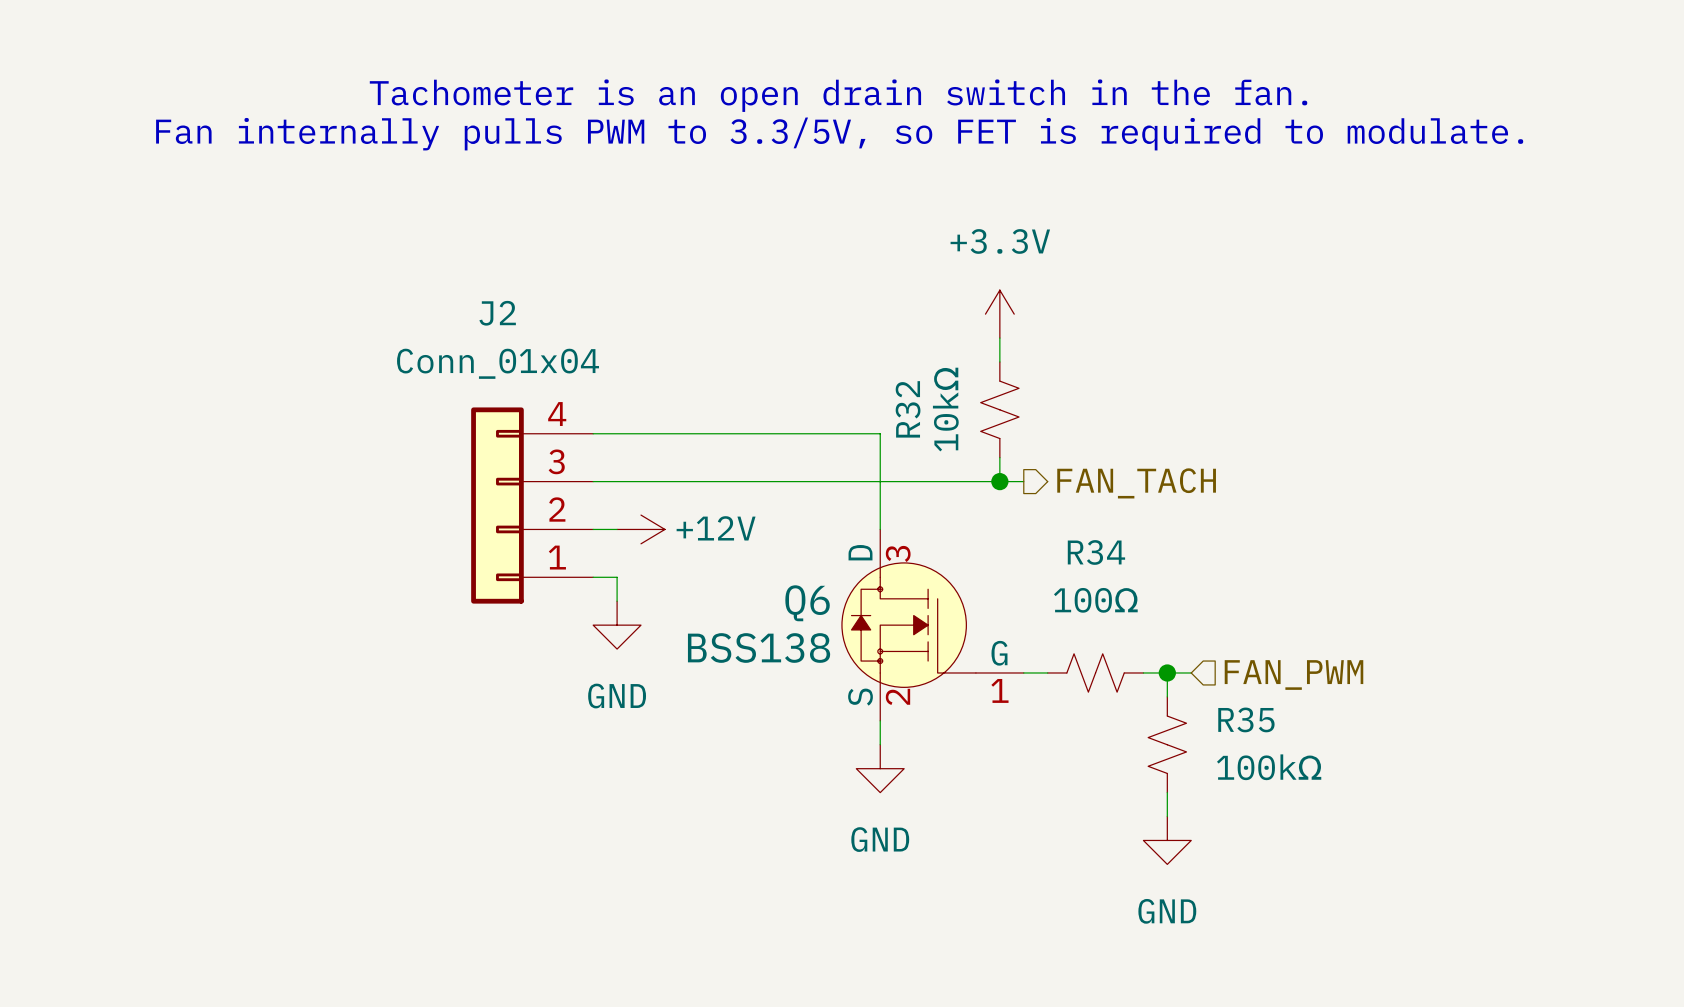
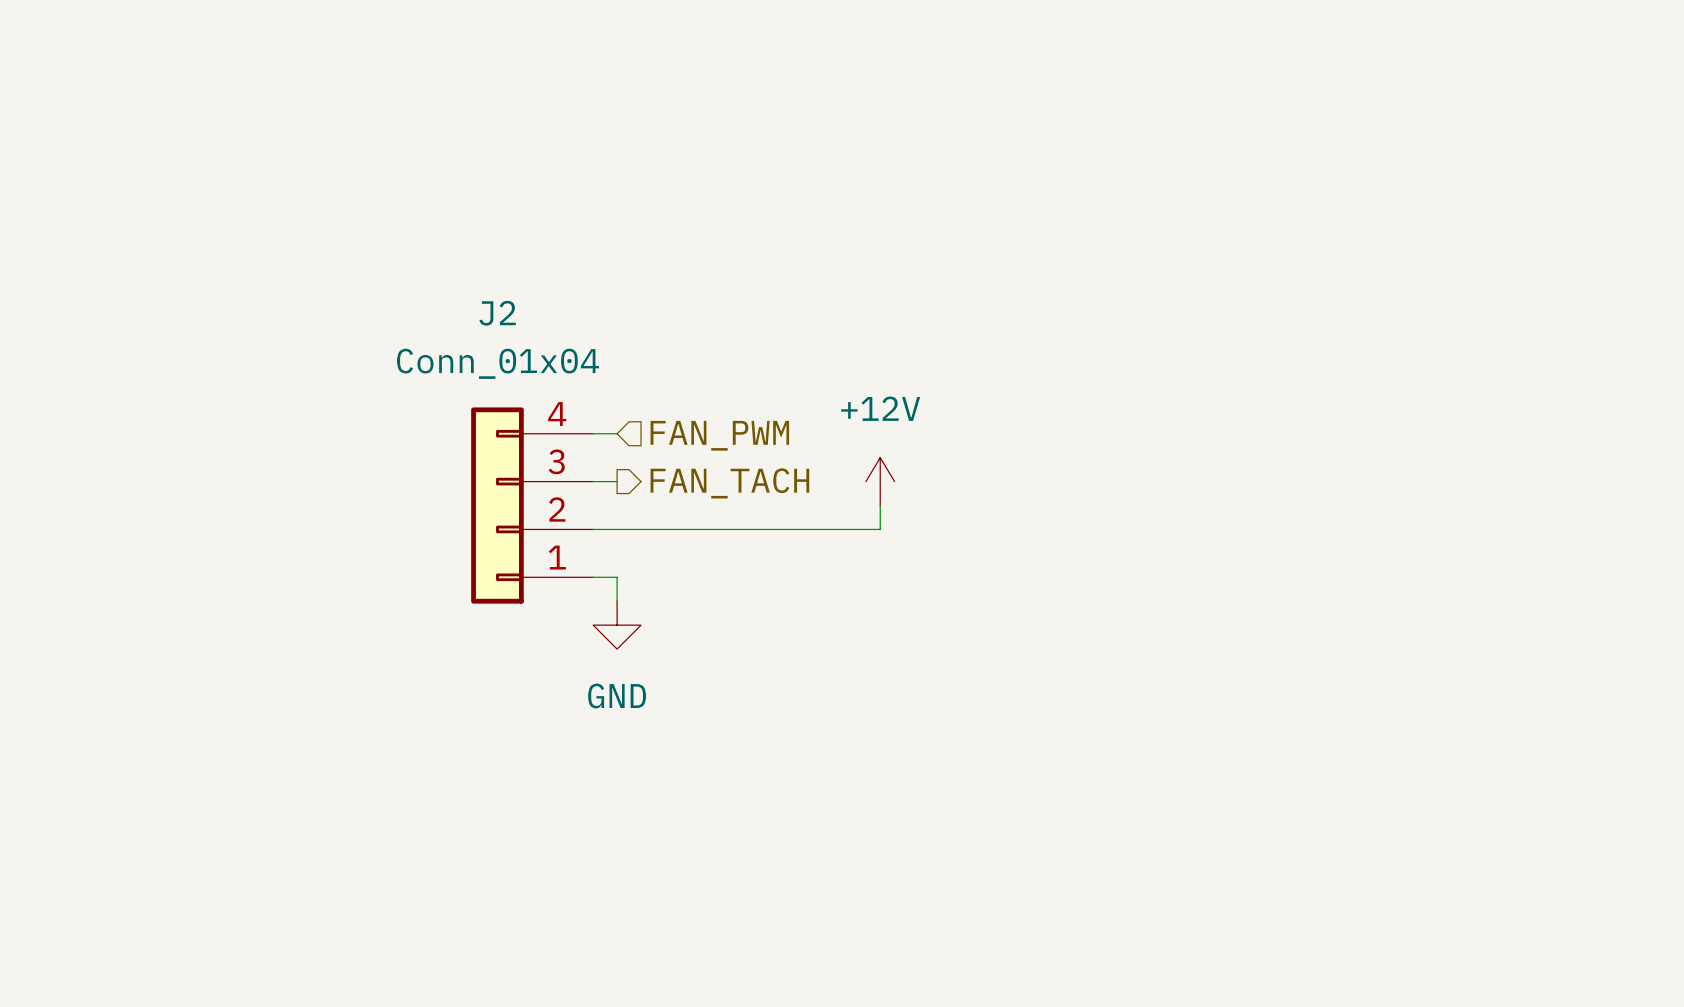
text: Tachometer is an open drain switch in the fan. (838, 95) -> none
text: Fan internally pulls PWM to 3.3/5V, so FET is required to modulate. (839, 133) -> none
power symbol: +3.3V (999, 314) -> none
wire: (999, 338) (999, 361) -> none
R32: 10kΩ (999, 409) -> none
wire: (617, 433) (880, 433) (880, 505) -> none
hierarchical label: none -> FAN_PWM (719, 435)
wire: (999, 457) (999, 481) -> none
wire: (617, 481) (1023, 481) -> none
junction: (999, 481) -> none
hierarchical label position: FAN_TACH (1136, 483) -> FAN_TACH (729, 483)
wire: none -> (617, 529) (880, 529)
power symbol rotation: 0° (641, 529) -> 90° counterclockwise (880, 481)
power symbol position: +12V (641, 529) -> +12V (880, 481)
Q6: BSS138 (932, 625) -> none
wire: (1023, 672) (1047, 672) -> none
R34: 100Ω (1095, 672) -> none
wire: (1143, 672) (1191, 672) -> none
wire: (1167, 672) (1167, 696) -> none
junction: (1167, 672) -> none
hierarchical label: FAN_PWM (1293, 674) -> none
wire: (880, 720) (880, 744) -> none
R35: 100kΩ (1167, 744) -> none
power symbol: GND (880, 768) -> none
wire: (1167, 792) (1167, 816) -> none
power symbol: GND (1167, 840) -> none

